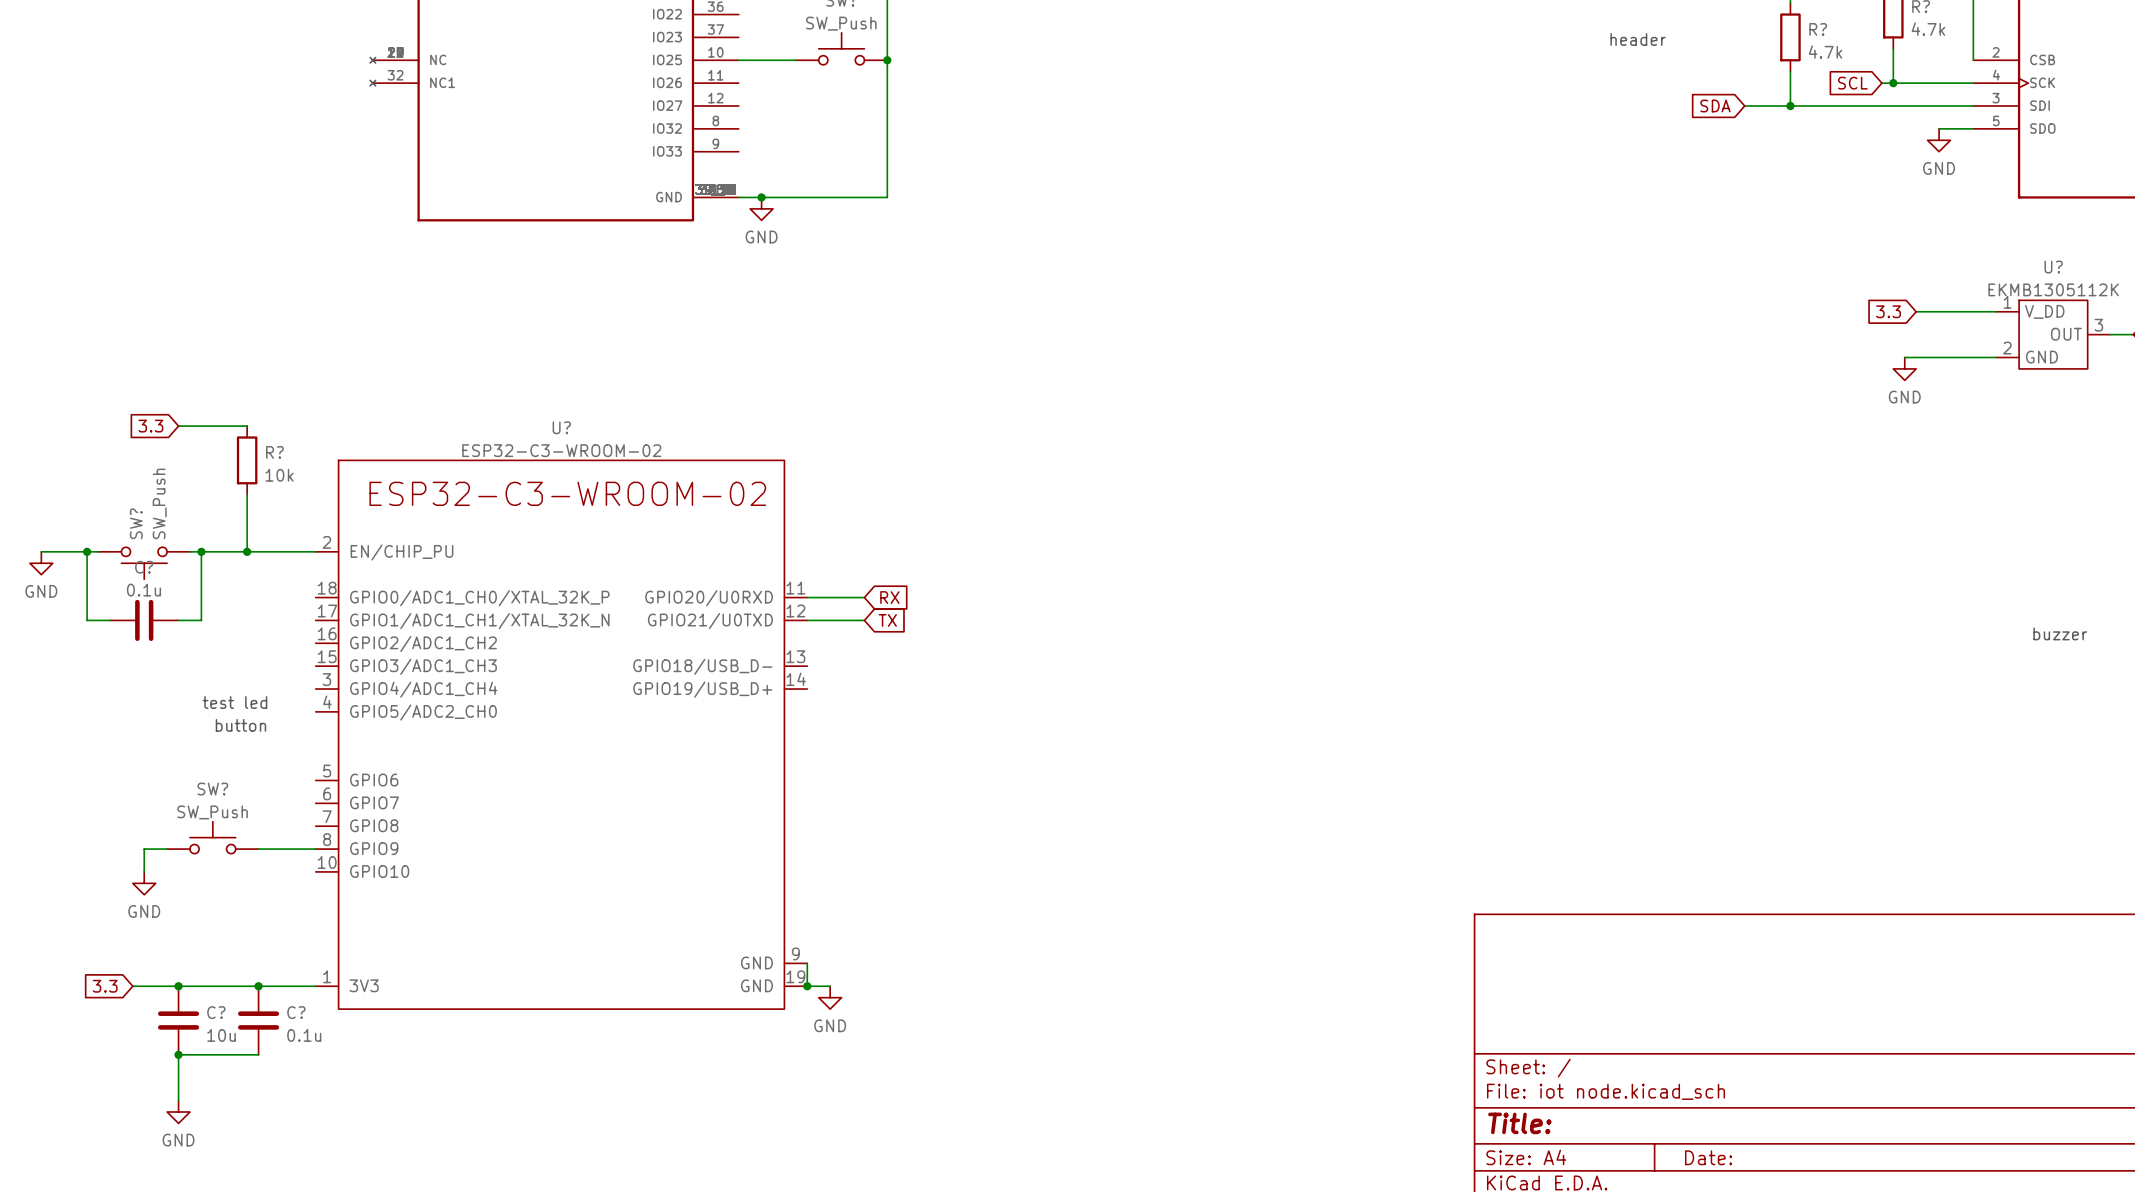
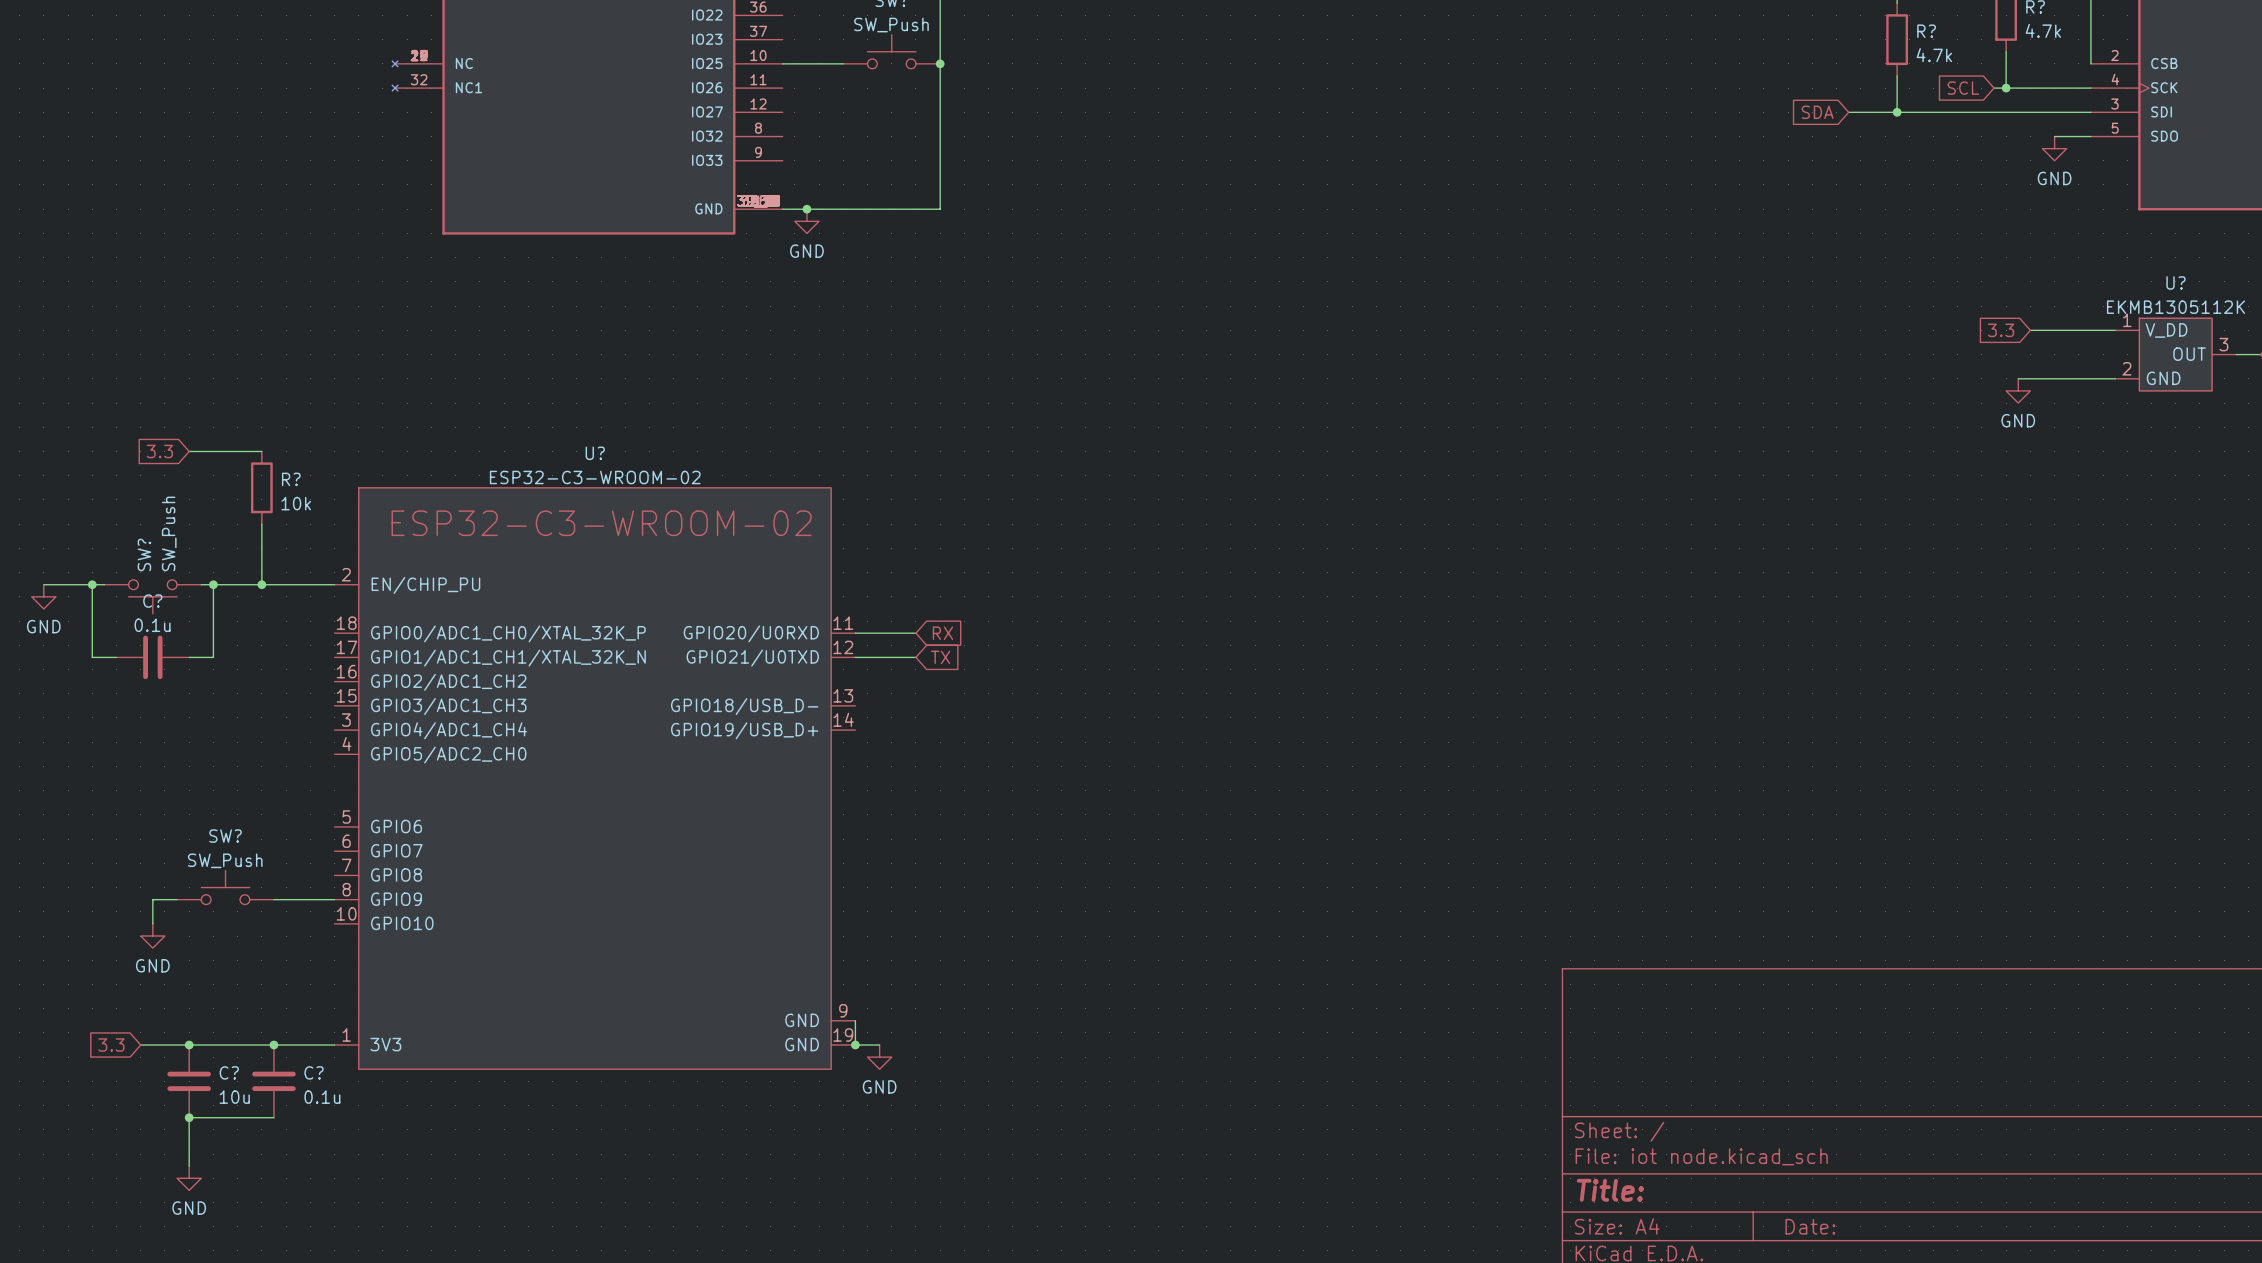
text: header (1638, 39) -> none
text: buzzer (2060, 633) -> none
text: test led (234, 702) -> none
text: button (240, 725) -> none

